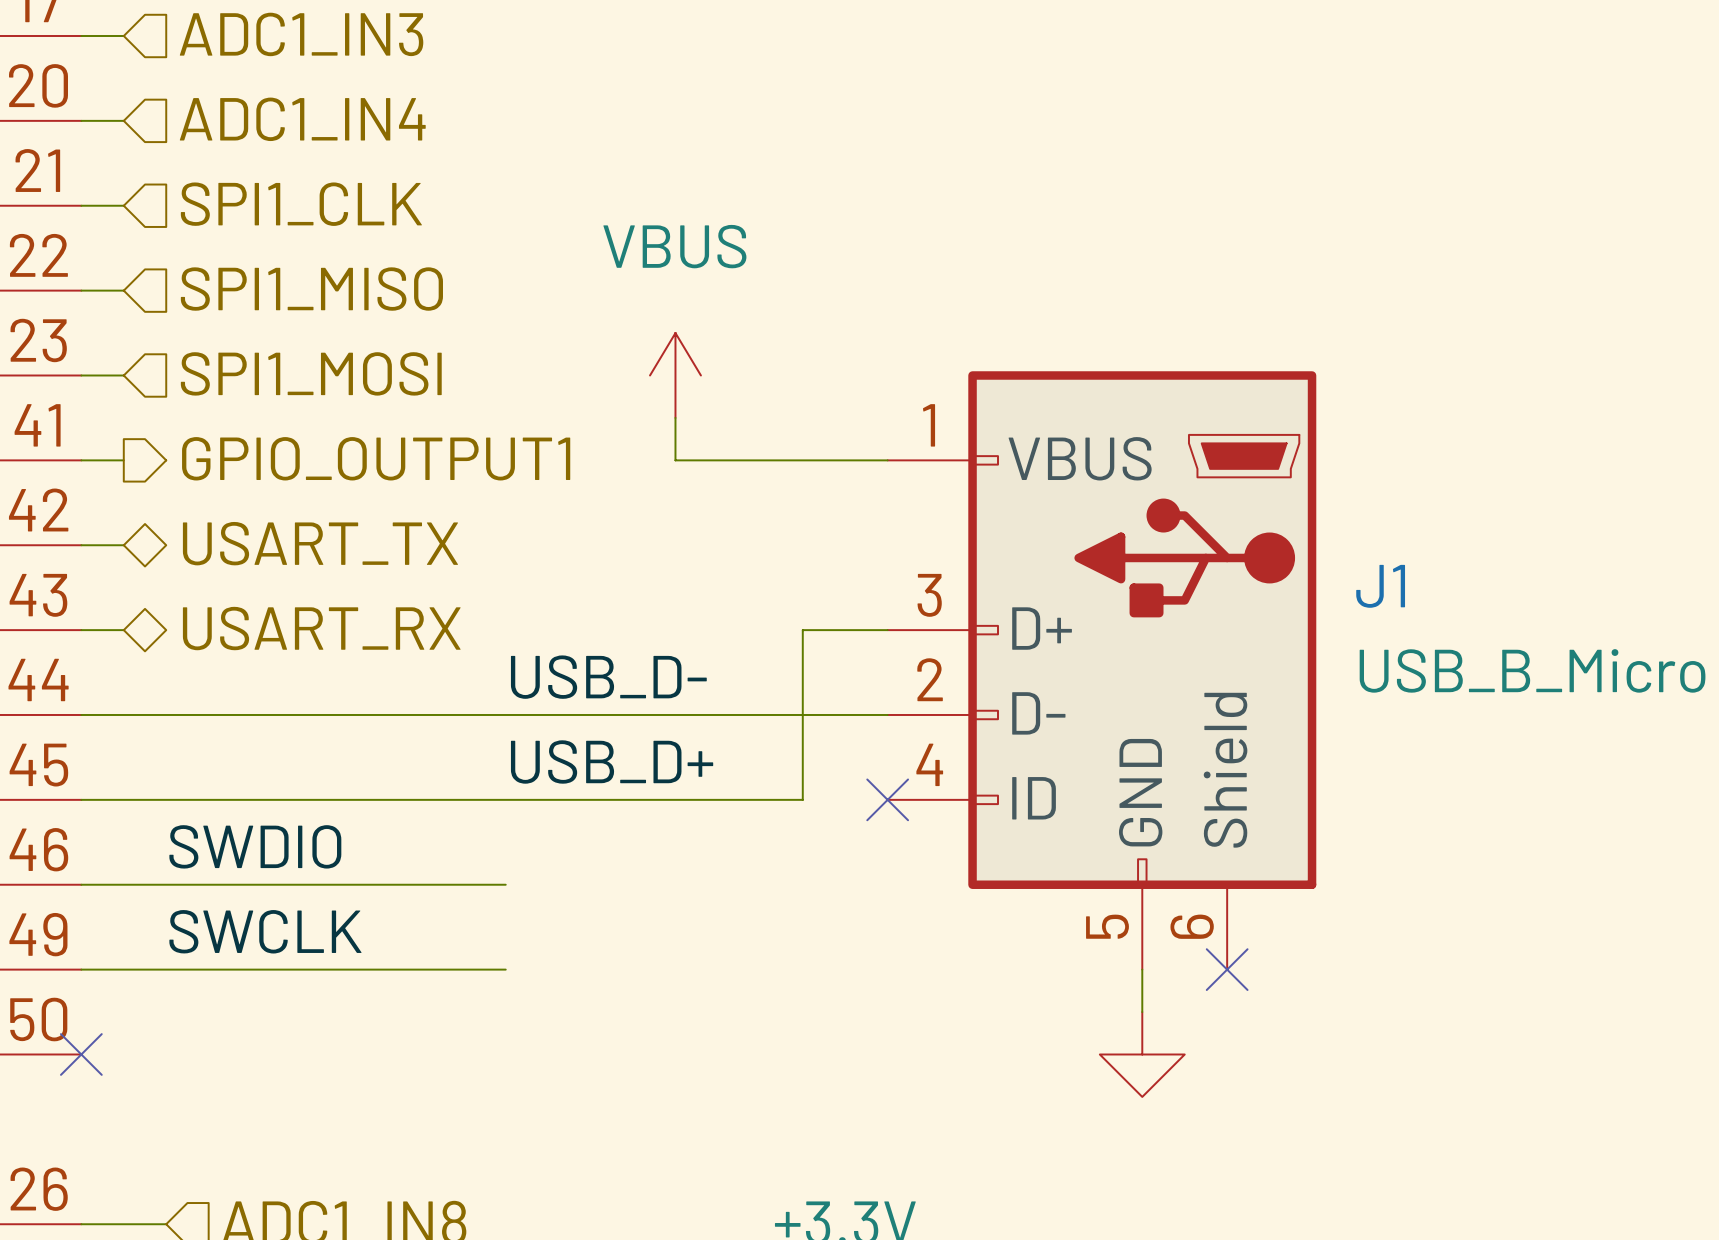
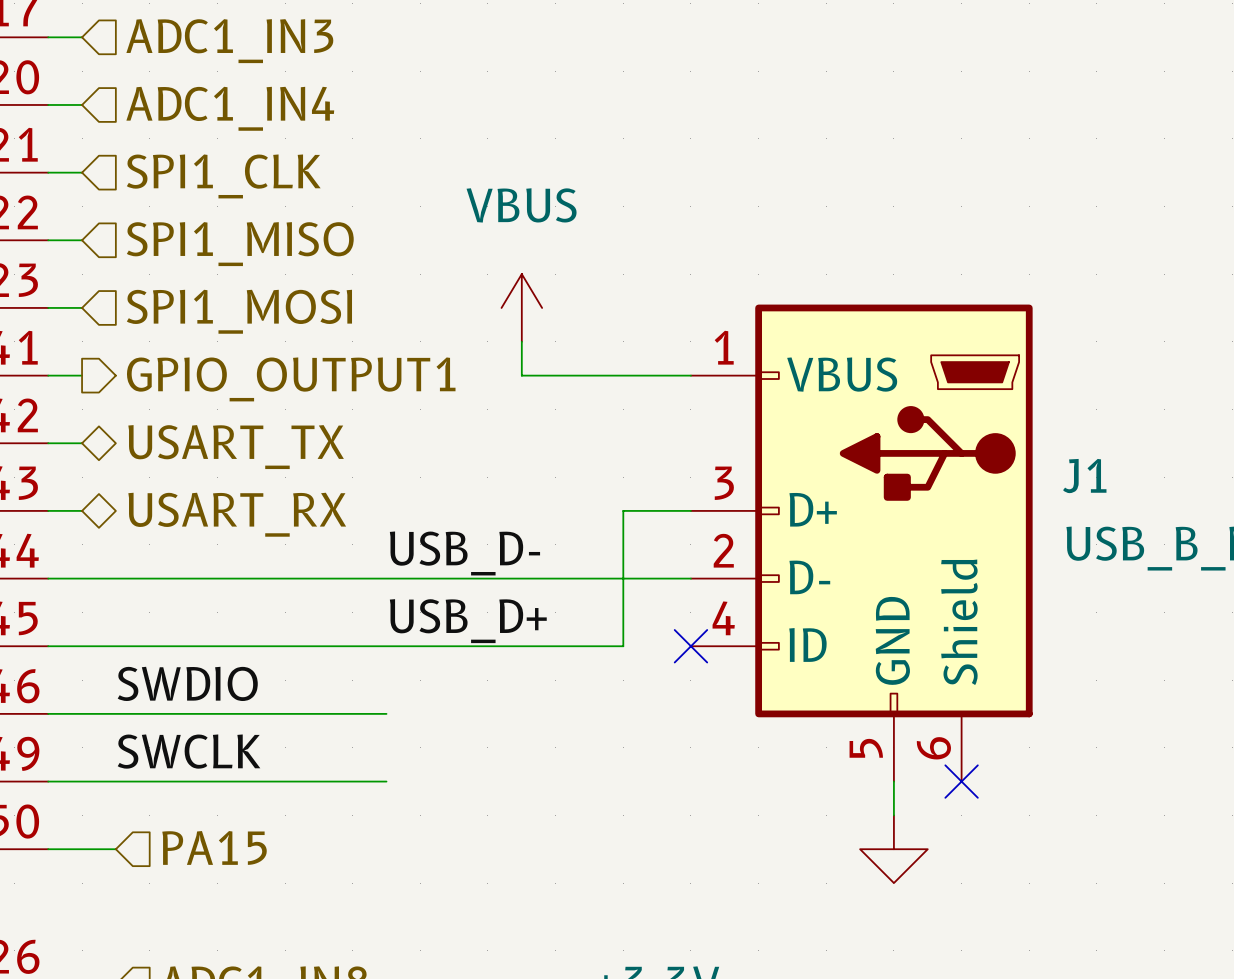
hierarchical label: none -> PA15 (214, 847)
wire: none -> (48, 849) (115, 849)
no-connect mark: (81, 1054) -> none

